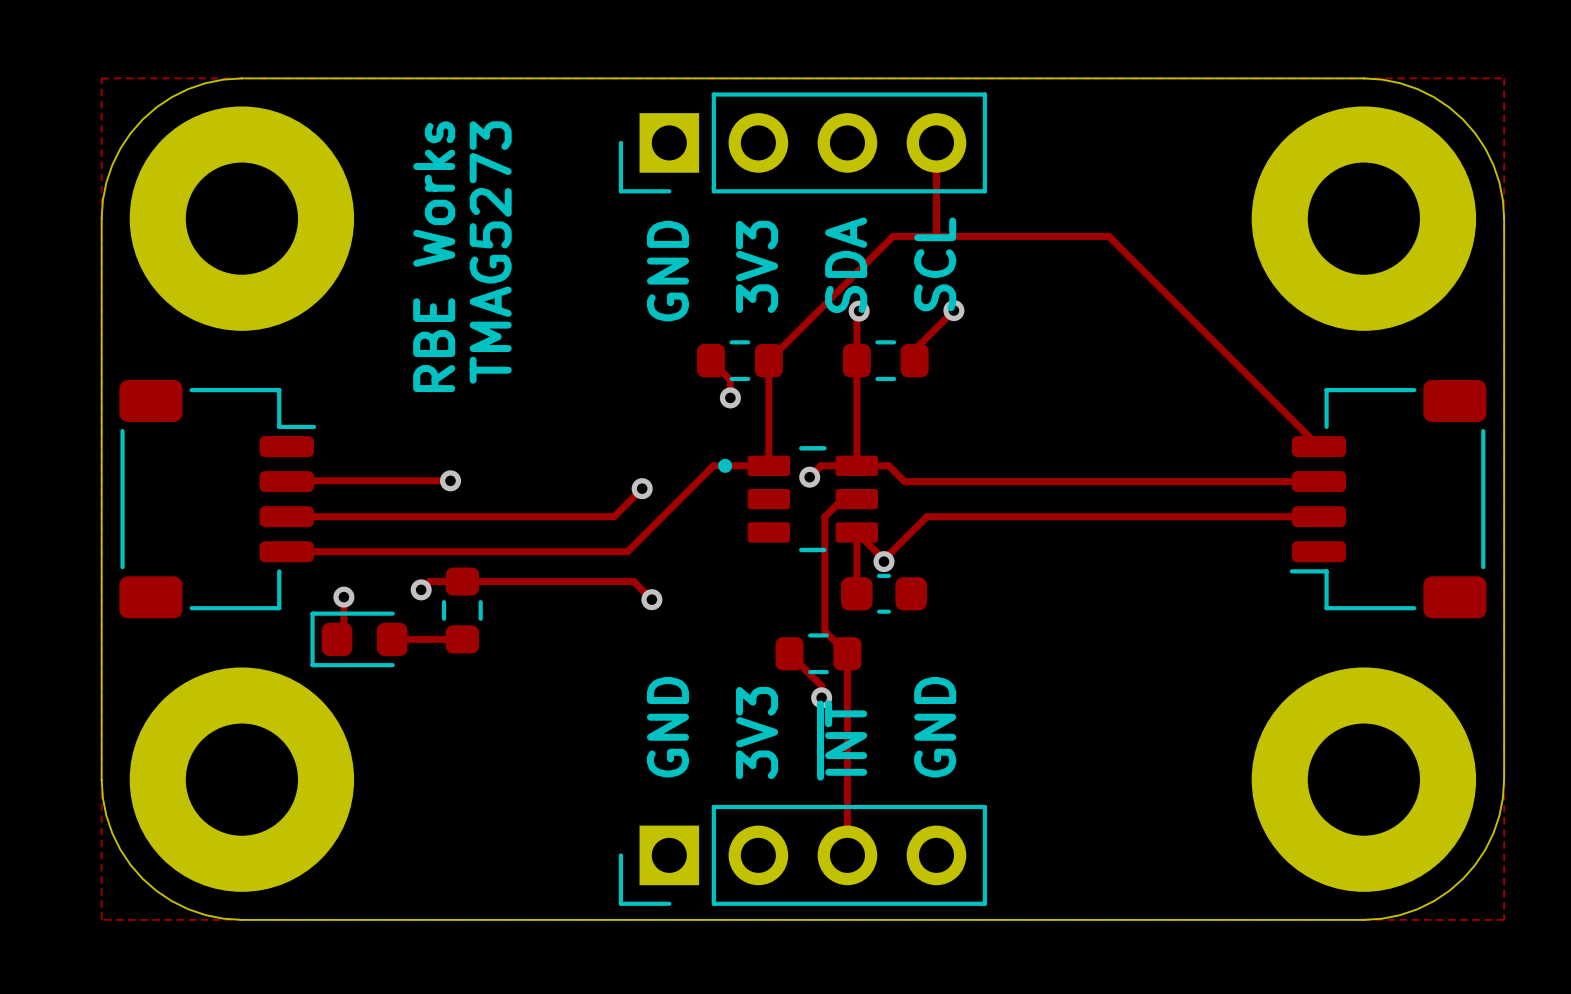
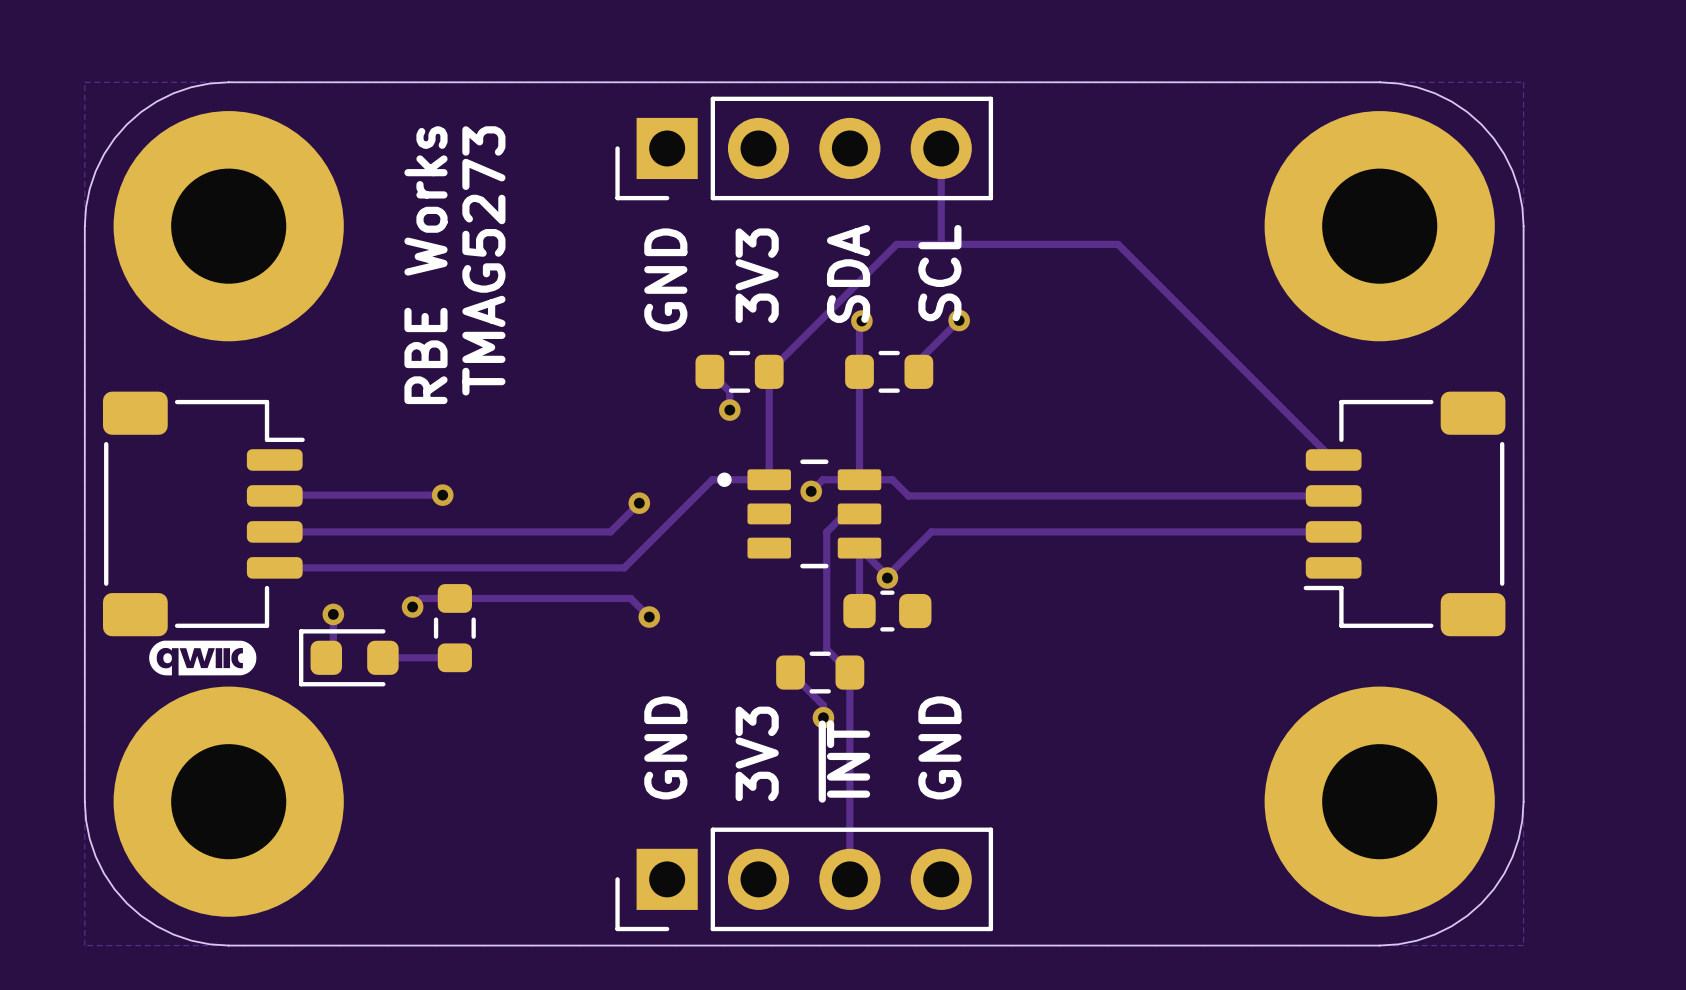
drawing: none -> [149, 640, 257, 676]

